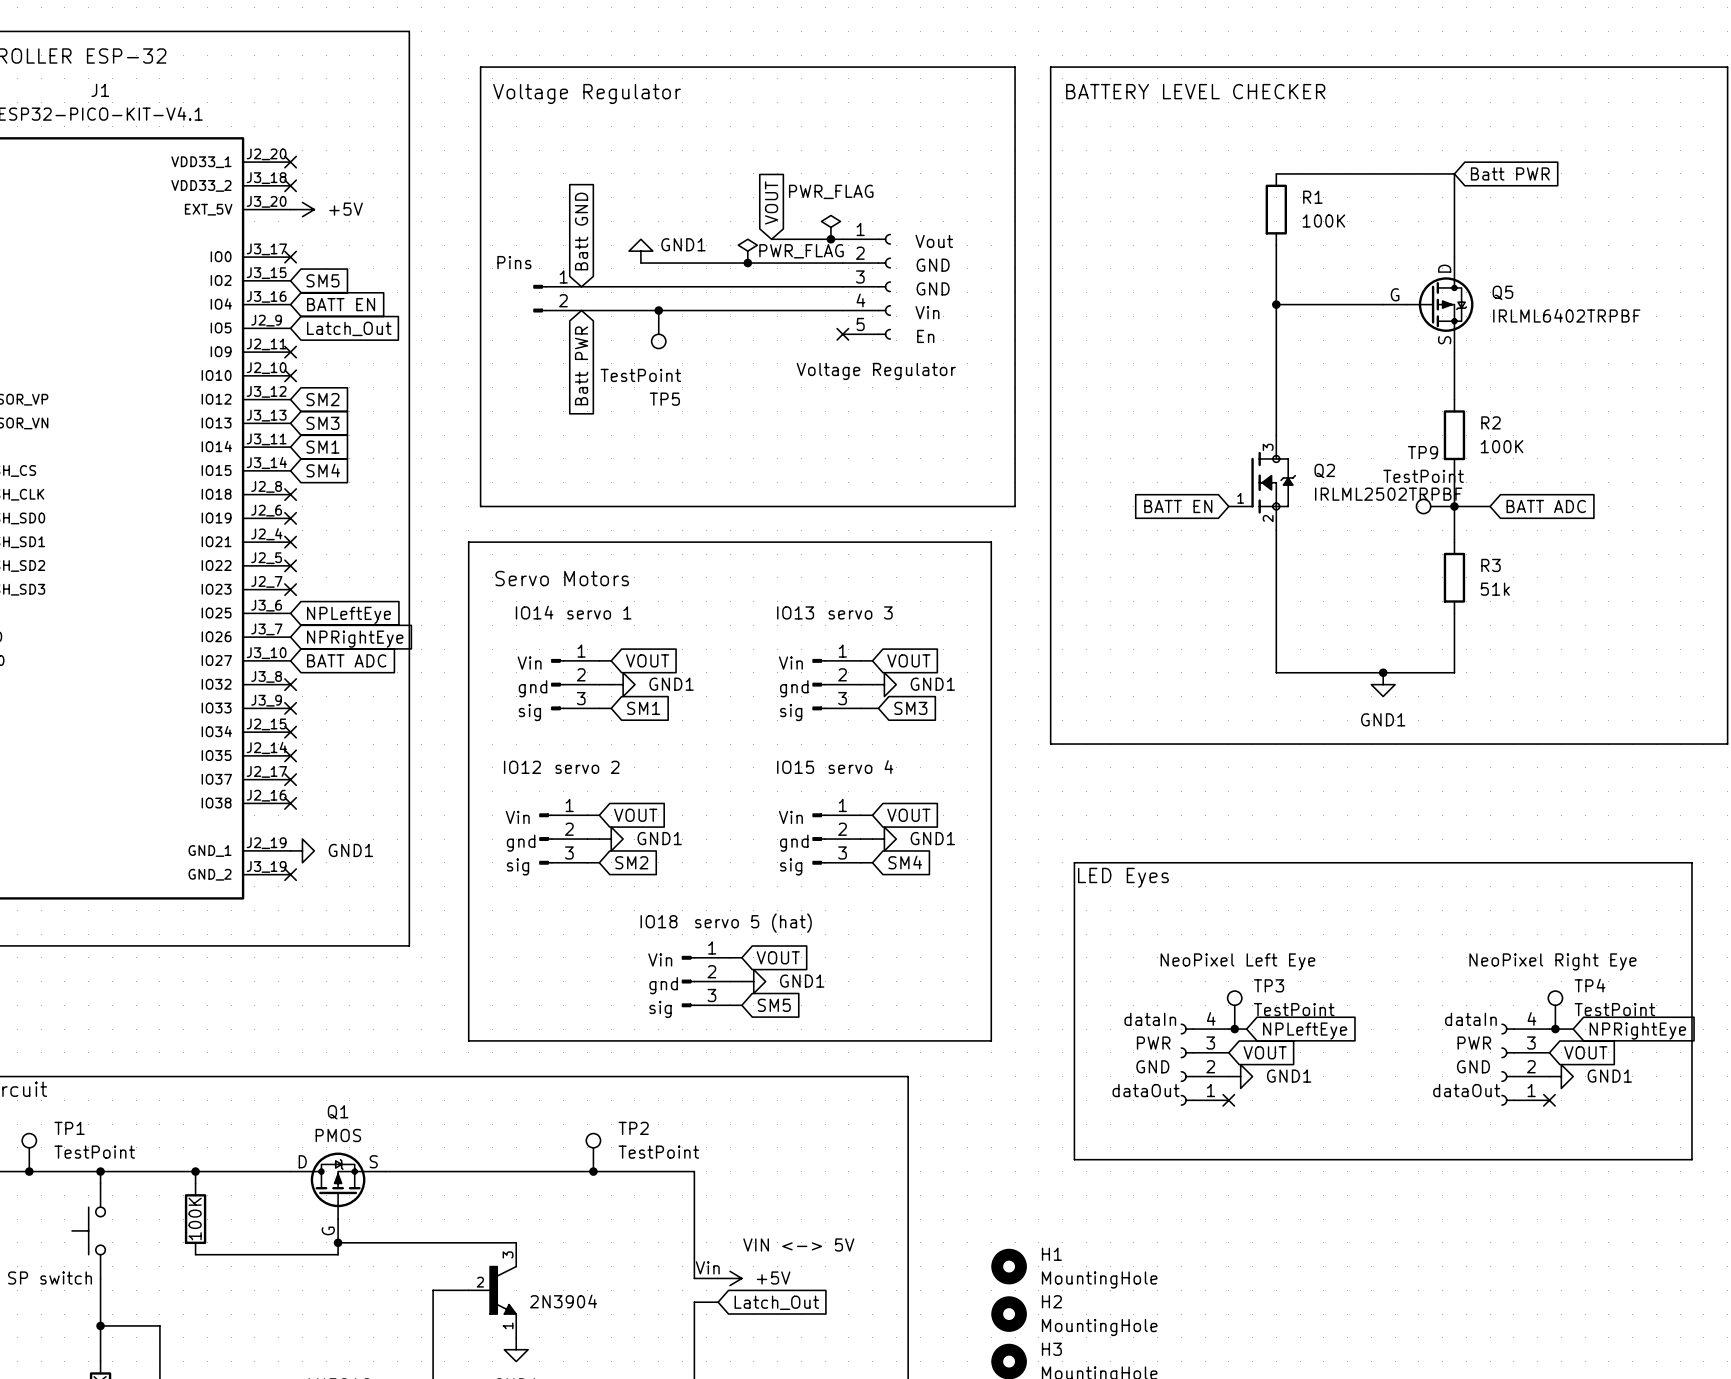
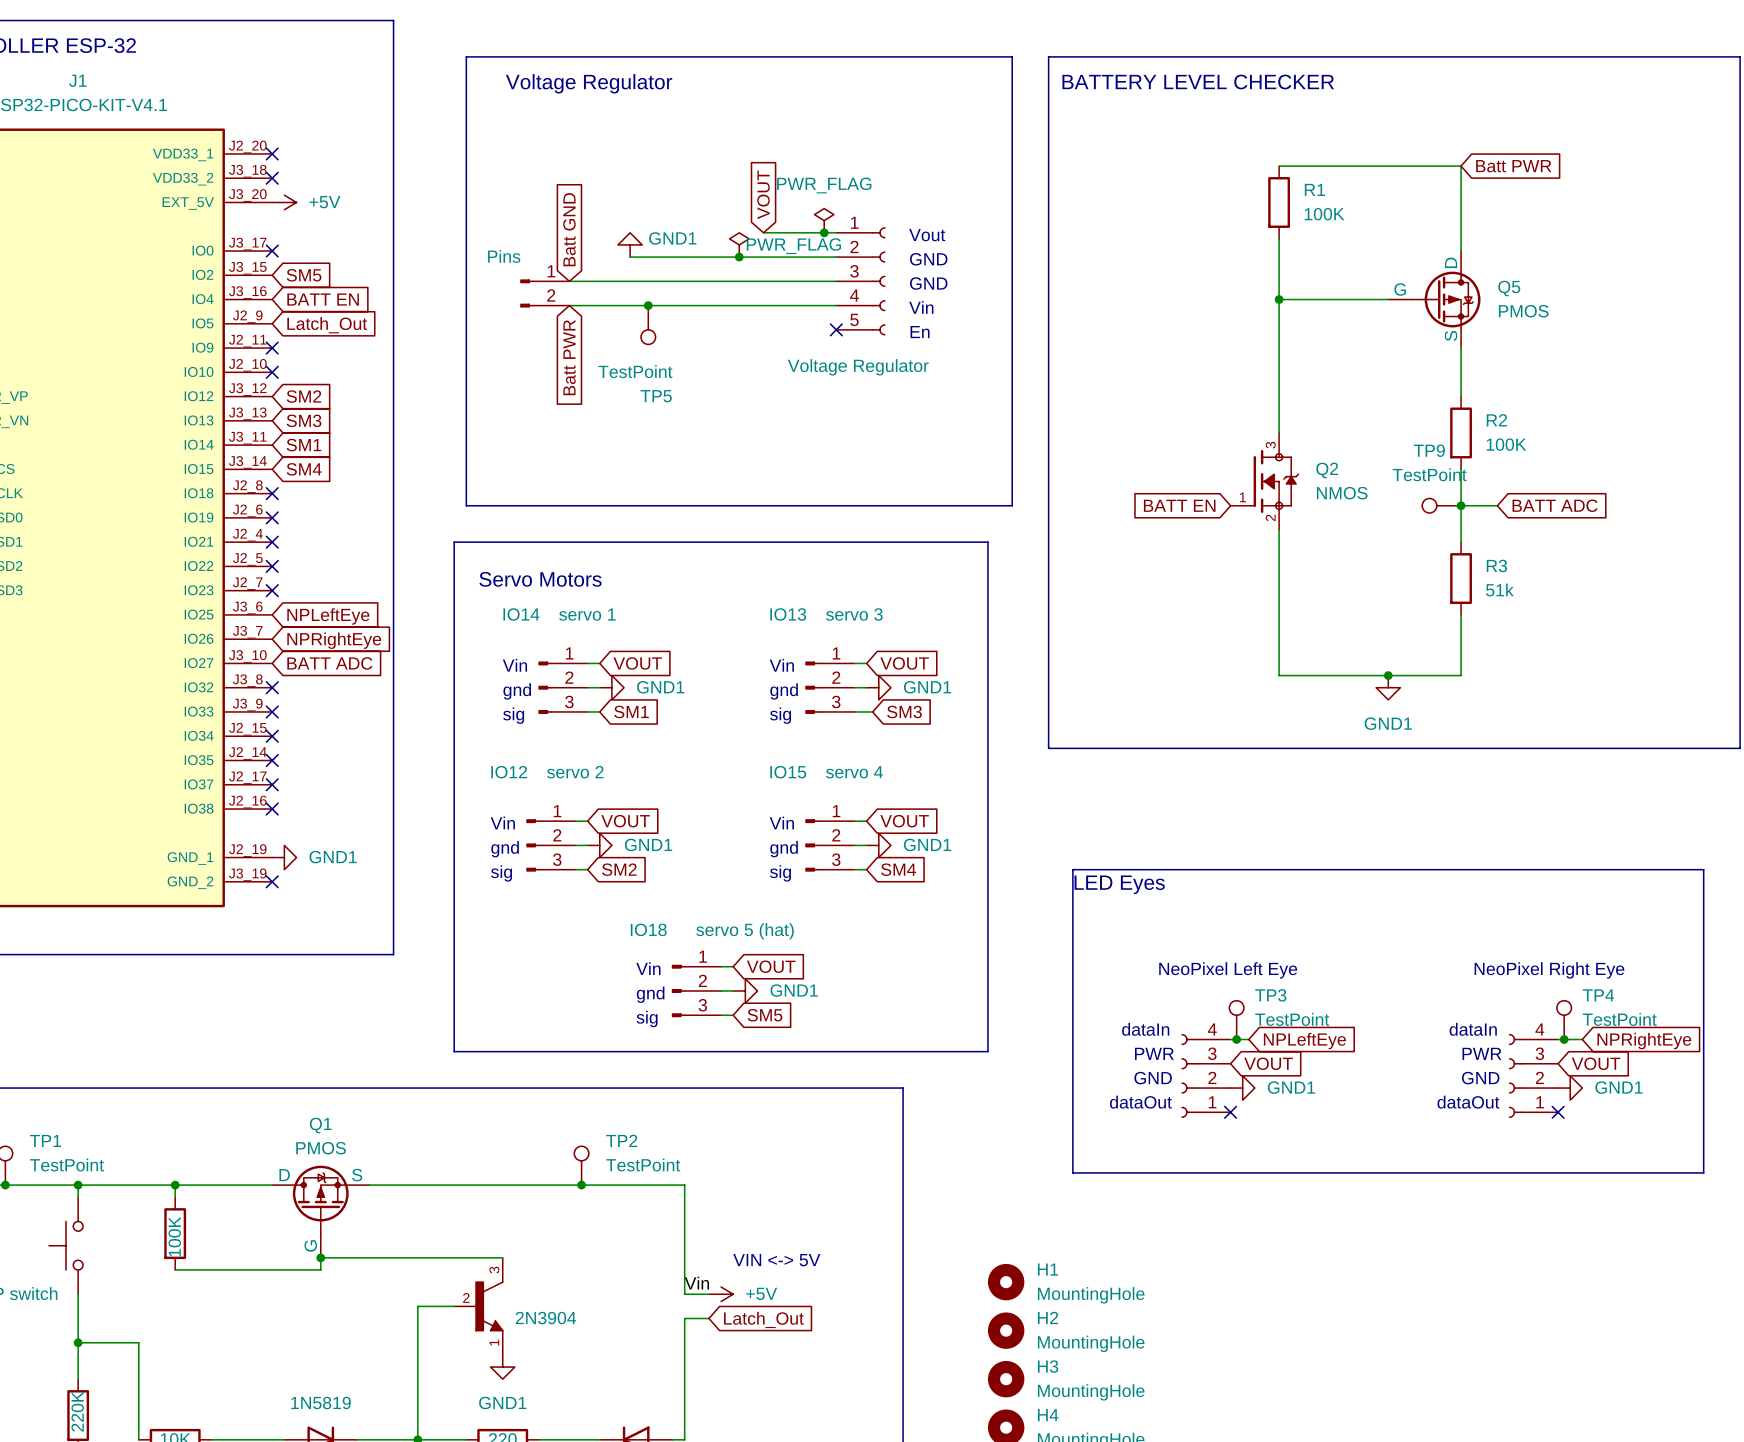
Q5 value: IRLML6402TRPBF (1566, 315) -> PMOS (1523, 311)
Q2 value: IRLML2502TRPBF (1388, 494) -> NMOS (1342, 493)

